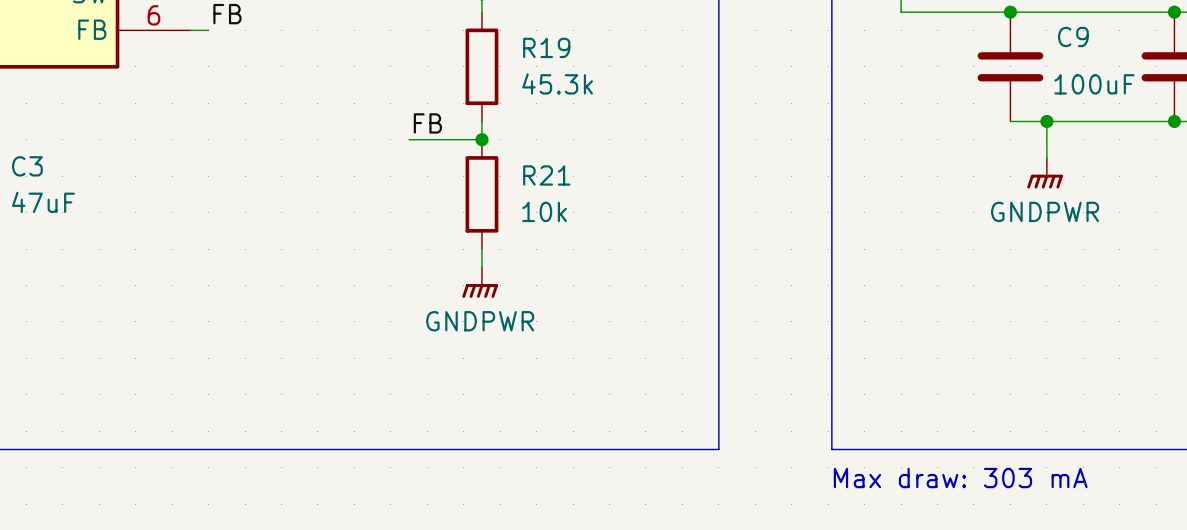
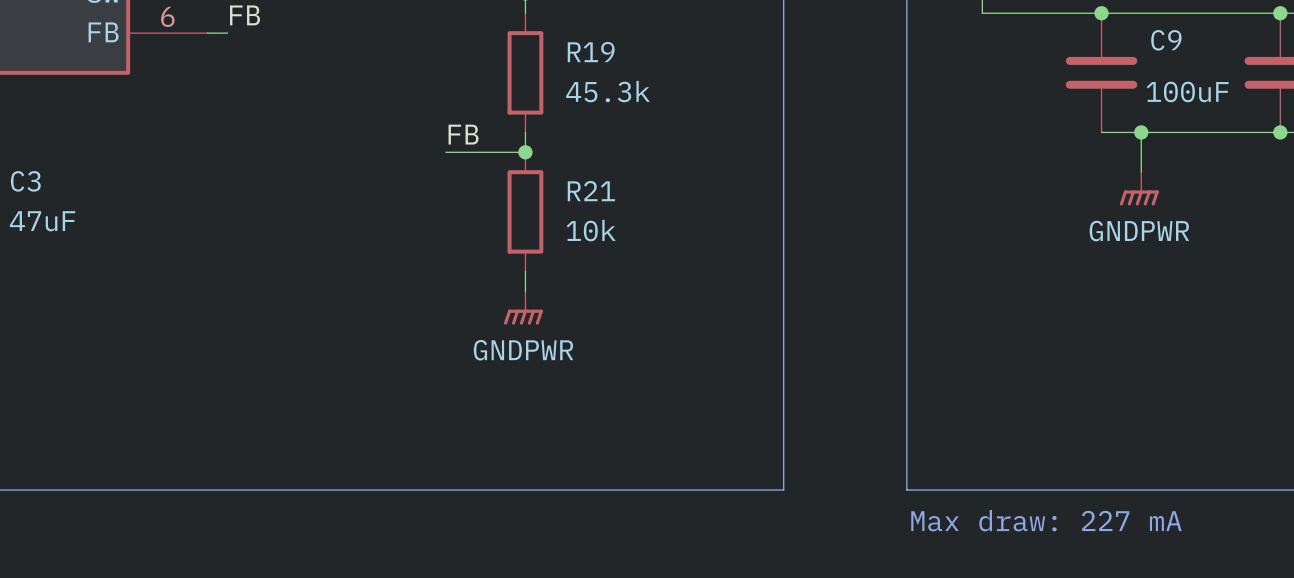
text: Max draw: 303 mA (960, 478) -> Max draw: 227 mA (1046, 520)

